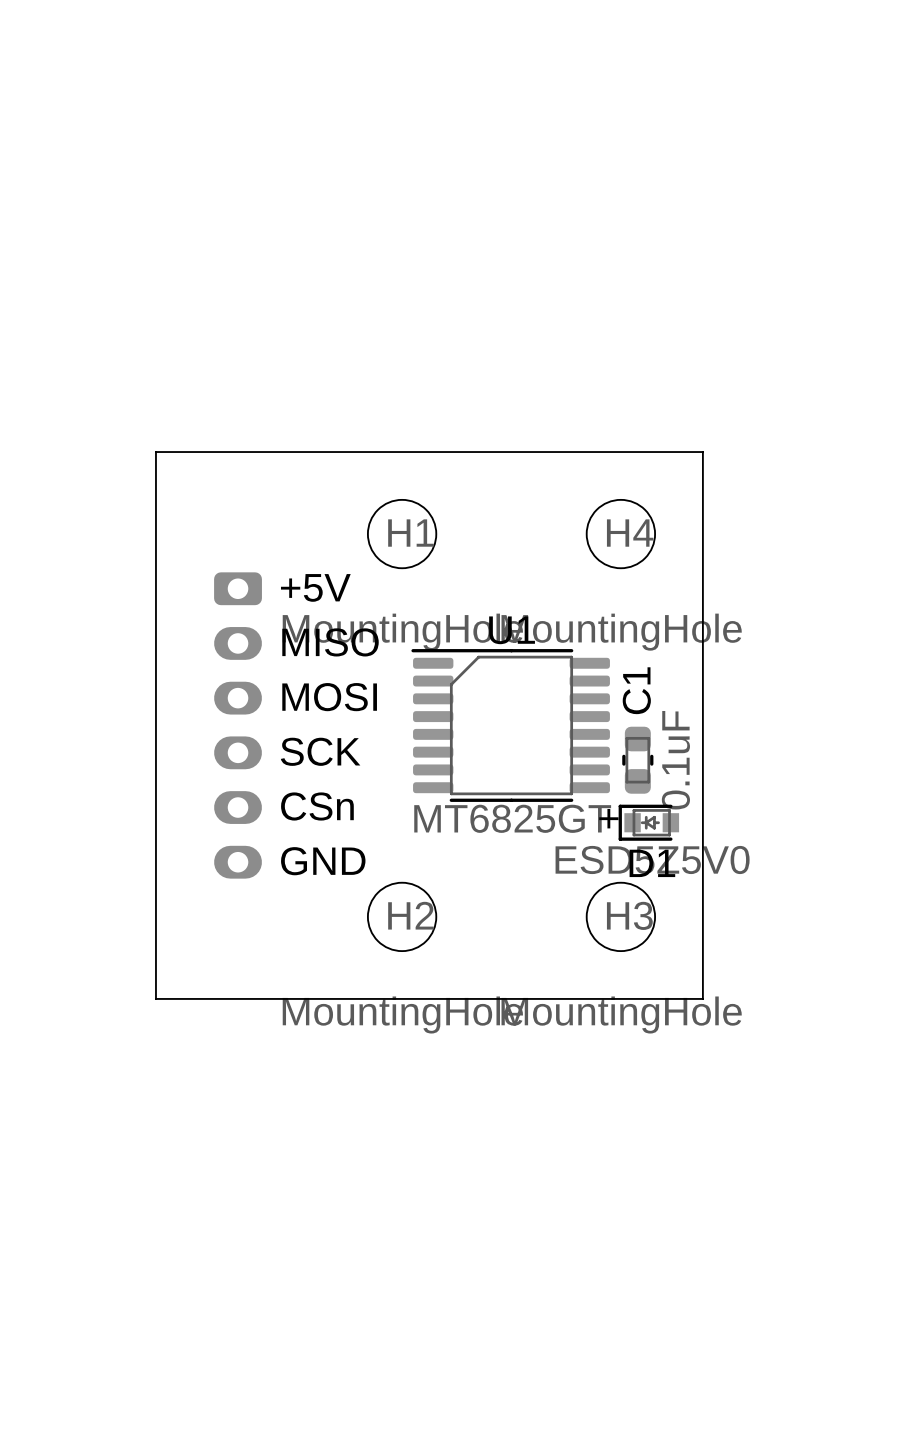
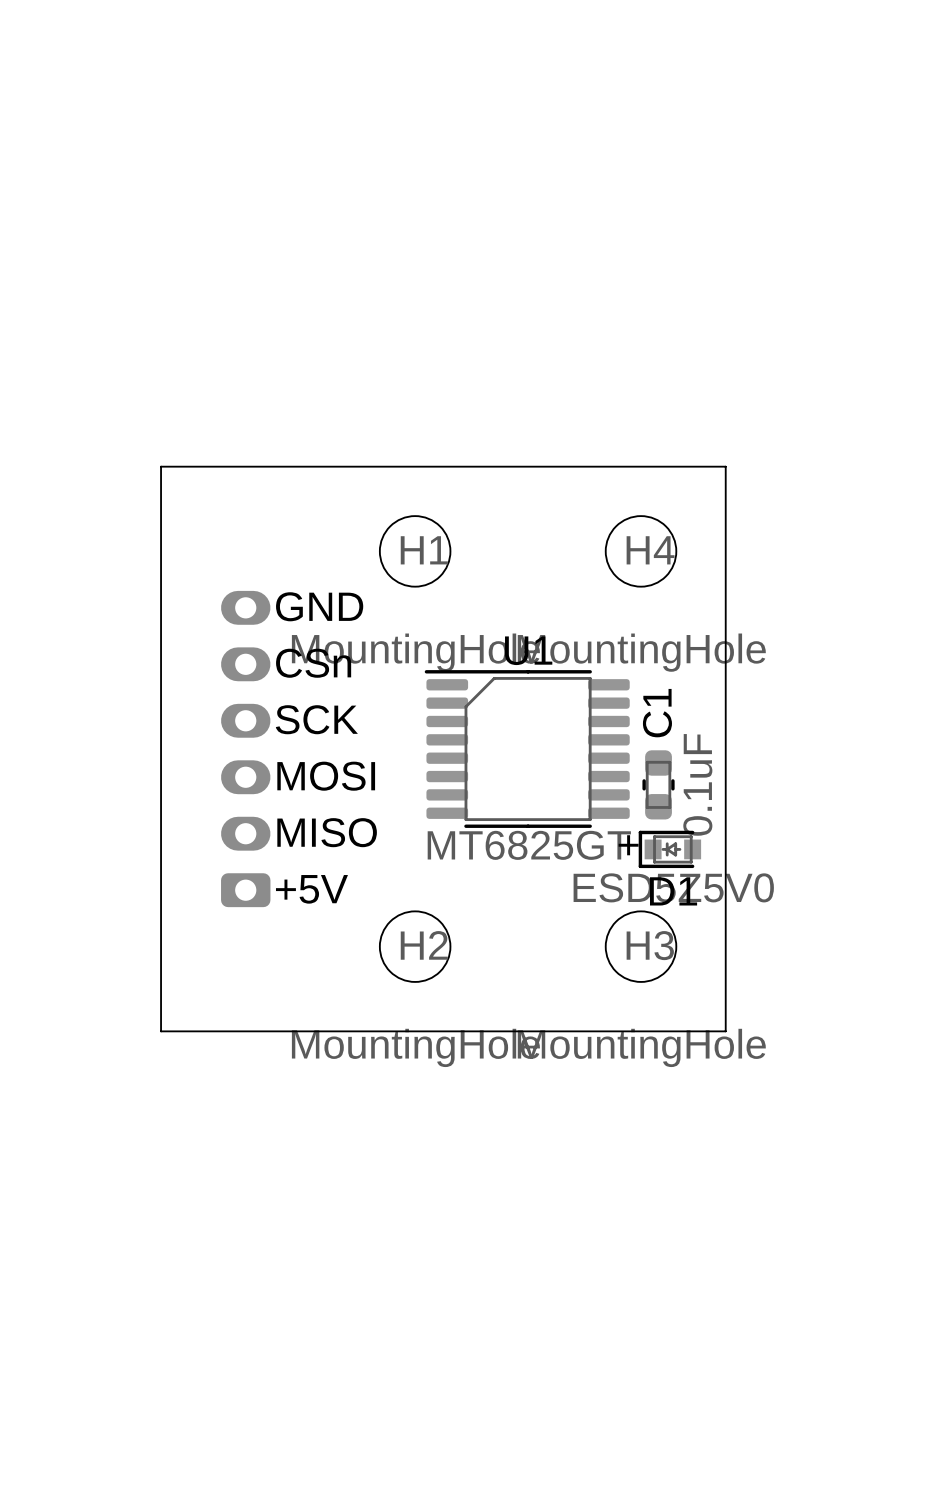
text: +5V (315, 587) -> GND (319, 606)
text: MISO (330, 642) -> CSn (313, 663)
text: MOSI (329, 697) -> SCK (316, 719)
part rotation: 0° (238, 725) -> 180° (245, 749)
text: SCK (320, 751) -> MOSI (326, 776)
text: CSn (317, 806) -> MISO (327, 832)
text: GND (323, 861) -> +5V (311, 889)

